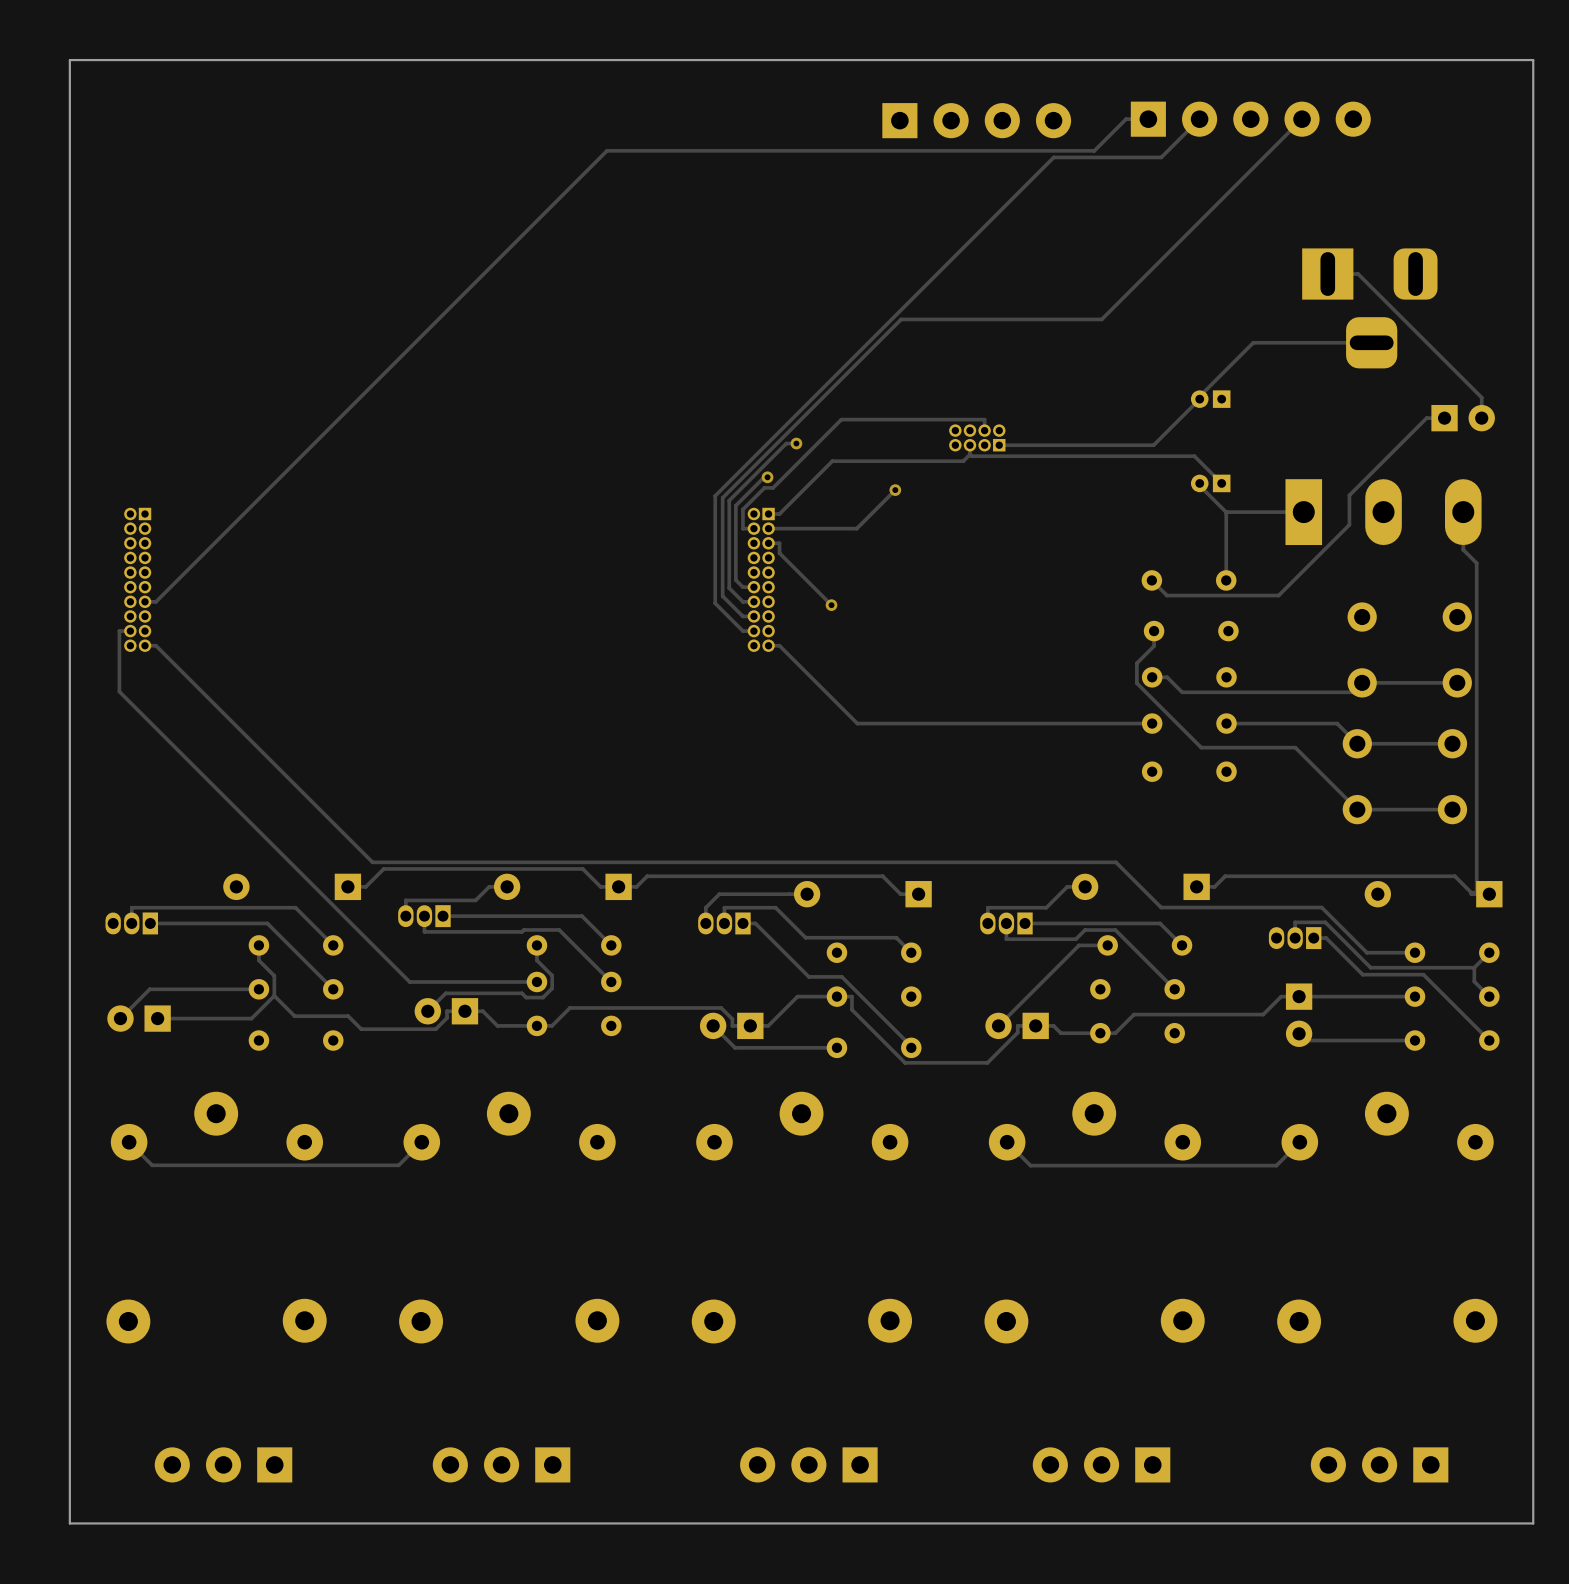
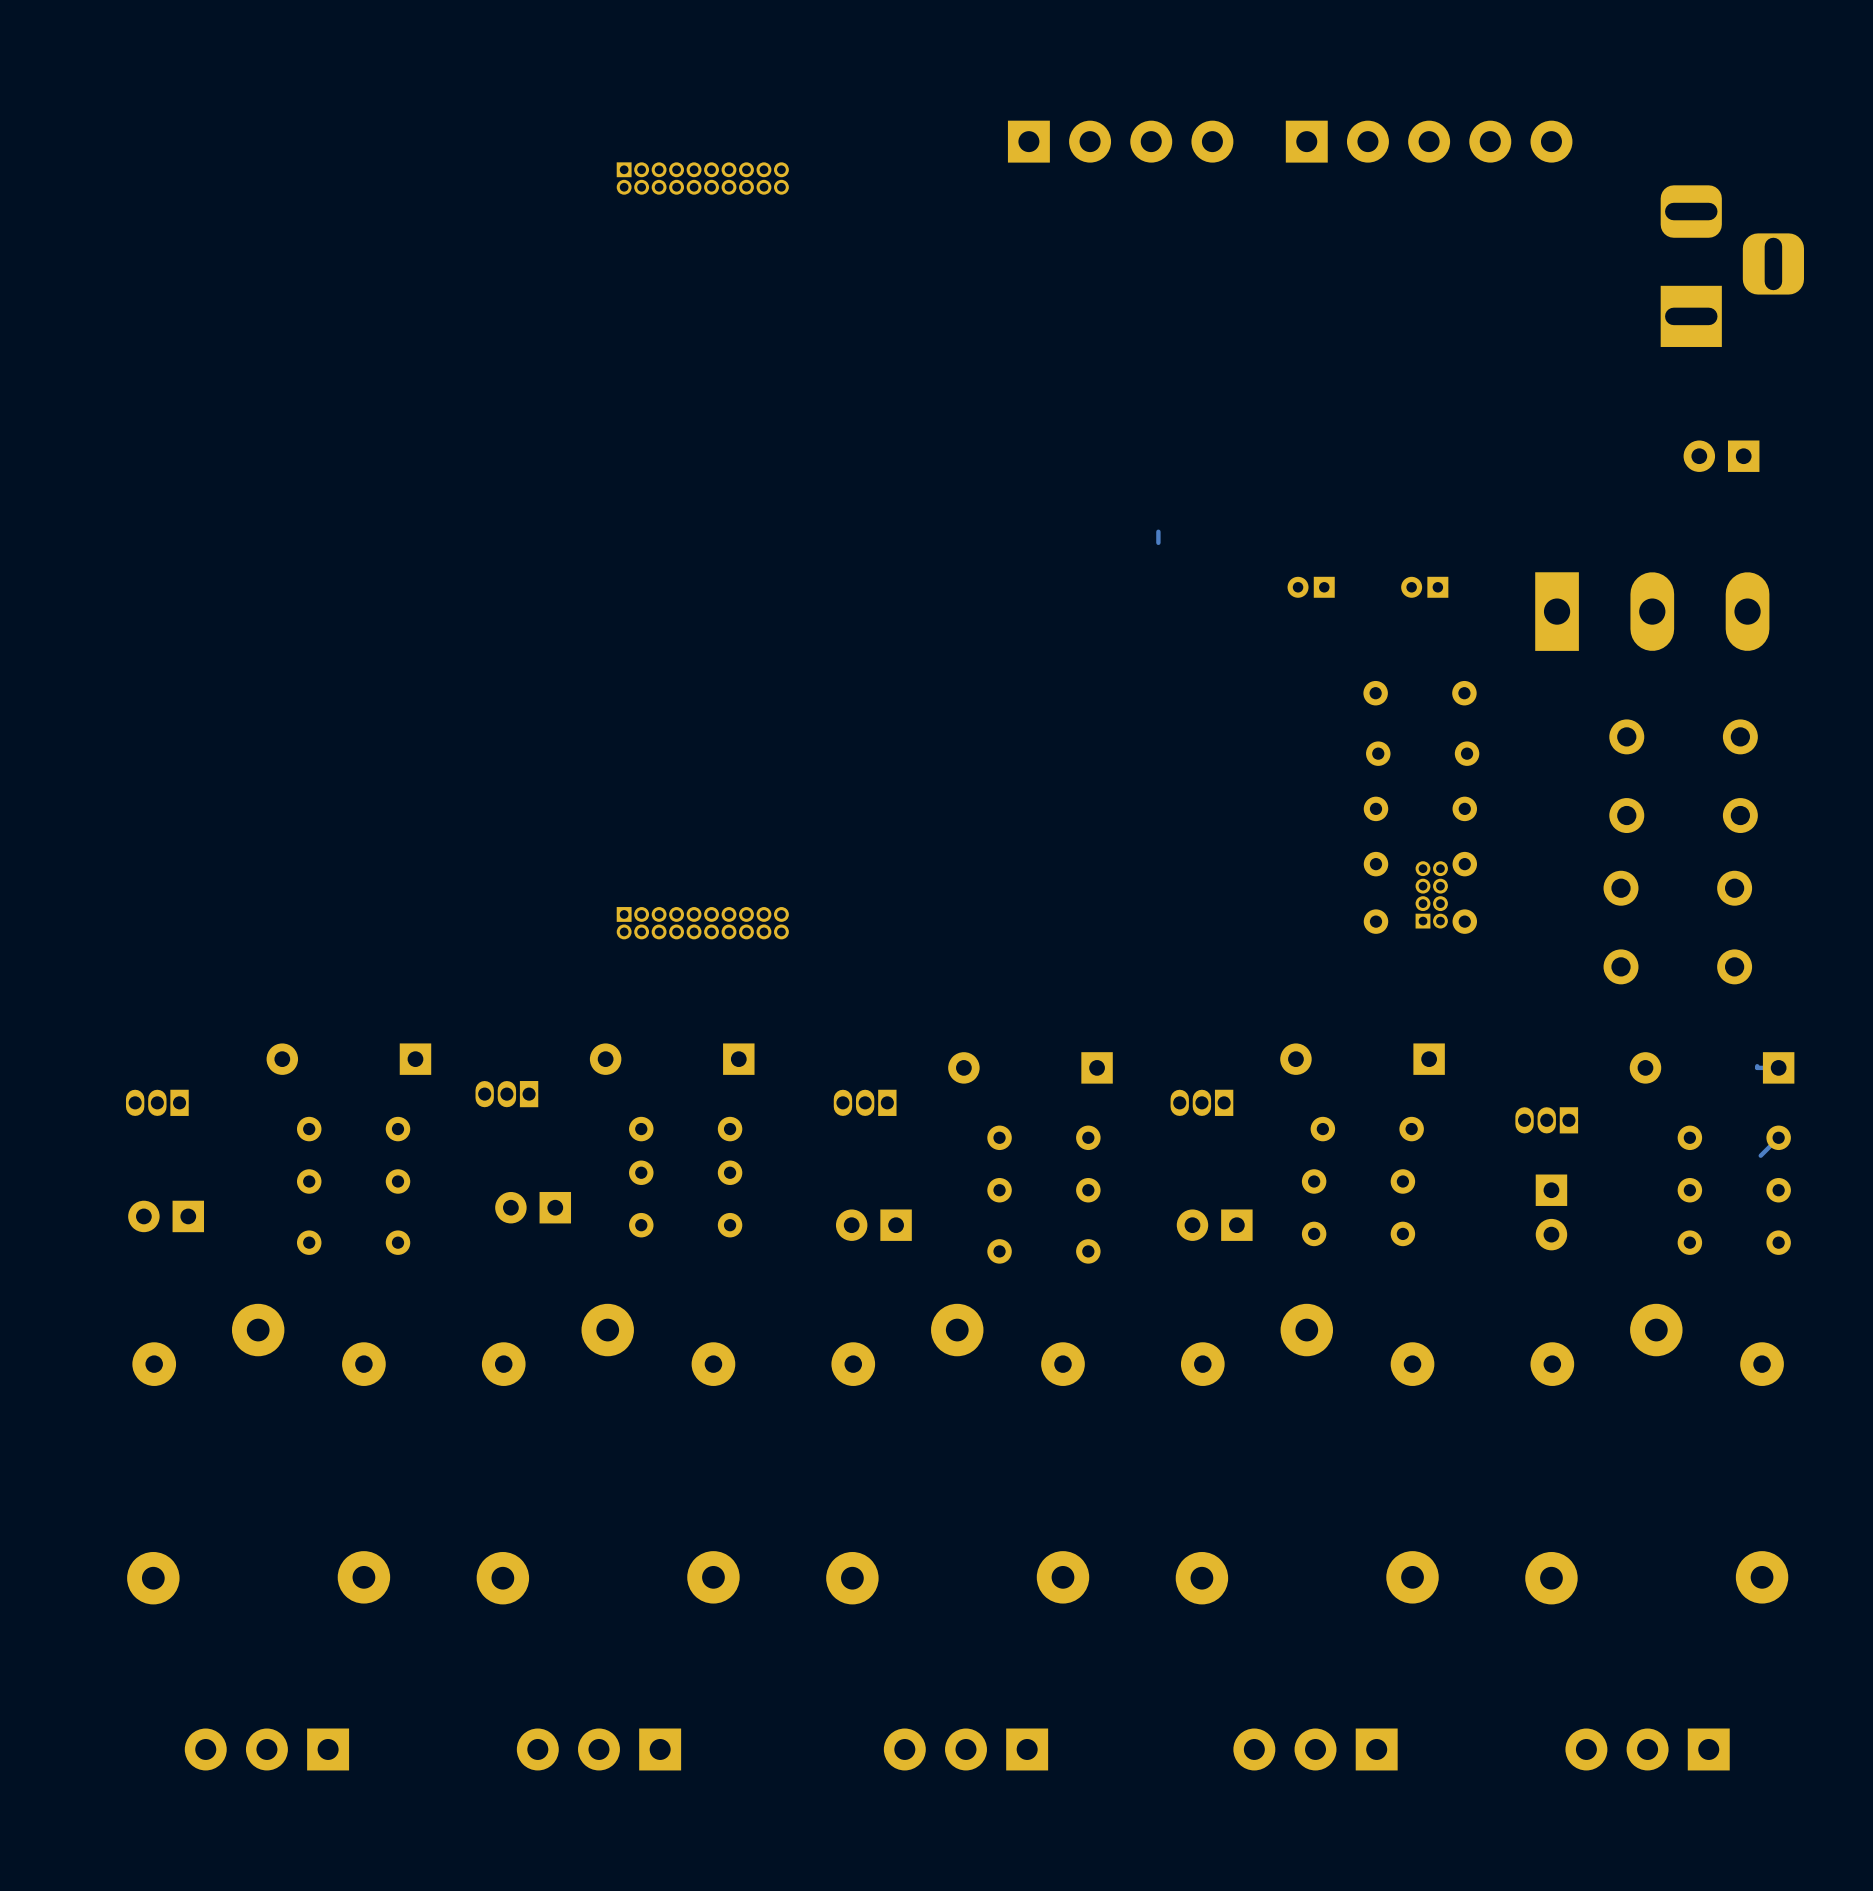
board edge: (1533, 60) (1533, 1523) (69, 1523) (69, 60) (1533, 60) -> none
track: (1148, 119) (1126, 119) (1094, 150) (606, 150) (155, 601) (145, 601) -> none
track: (1199, 119) (1161, 157) (1053, 157) (715, 495) (715, 603) (742, 631) (753, 631) -> none
part position: (1250, 119) -> (1429, 141)
track: (1302, 119) (1101, 319) (901, 319) (722, 497) (722, 596) (742, 616) (753, 616) -> none
part position: (976, 120) -> (1120, 141)
part: none -> (702, 178)
track: (1327, 274) (1358, 274) (1481, 397) (1481, 418) -> none
part rotation: 0° (1369, 308) -> 90° counterclockwise (1732, 266)
part position: (1369, 308) -> (1732, 266)
track: (1371, 342) (1253, 342) (1153, 445) (999, 445) -> none
part: (1210, 399) -> none
track: (1444, 418) (1426, 418) (1349, 495) (1349, 524) (1278, 595) (1166, 595) (1151, 580) -> none
part rotation: 0° (1463, 418) -> 180° (1721, 456)
part position: (1463, 418) -> (1721, 456)
track: (984, 430) (984, 419) (841, 419) (773, 487) (764, 487) (742, 509) (742, 528) (753, 528) -> none
part: (977, 437) -> none
track: (796, 443) (786, 443) (729, 500) (729, 588) (742, 601) (753, 601) -> none
via: (796, 443) -> none
track: (767, 477) (764, 477) (735, 505) (735, 580) (742, 587) (753, 587) -> none
via: (767, 477) -> none
track: (1199, 483) (1199, 485) (1226, 512) (1303, 512) -> none
part position: (1210, 483) -> (1424, 587)
track: (1221, 483) (1194, 456) (971, 456) (969, 454) (963, 461) (832, 461) (779, 514) (768, 514) -> none
track: (895, 490) (856, 528) (768, 528) -> none
via: (895, 490) -> none
part: none -> (1311, 587)
track: (1226, 512) (1226, 580) -> none
track: (1463, 512) (1463, 549) (1476, 563) (1476, 891) (1471, 892) (1454, 876) (1225, 876) (1214, 886) (1196, 886) -> none
track: (768, 543) (779, 543) (779, 553) (831, 605) -> none
part: (137, 579) -> none
part: (761, 579) -> none
via: (831, 605) -> none
track: (130, 631) (119, 631) (119, 691) (409, 981) (536, 981) -> none
track: (1154, 631) (1154, 646) (1136, 663) (1136, 683) (1201, 747) (1295, 747) (1357, 809) (1452, 809) -> none
track: (145, 645) (155, 645) (372, 862) (1115, 862) (1161, 907) (1321, 907) (1366, 952) (1414, 952) -> none
track: (768, 645) (779, 645) (857, 723) (1152, 723) -> none
track: (1152, 677) (1167, 677) (1182, 692) (1352, 692) (1362, 682) (1457, 682) -> none
track: (1226, 723) (1337, 723) (1357, 743) (1452, 743) -> none
part: none -> (1431, 894)
part: none -> (702, 923)
track: (347, 886) (365, 886) (383, 868) (582, 868) (600, 886) (636, 886) (647, 876) (882, 876) (900, 894) (918, 894) -> none
track: (507, 886) (489, 886) (475, 900) (405, 900) (405, 916) -> none
track: (1085, 886) (1067, 886) (1046, 907) (987, 907) (987, 923) -> none
track: (807, 894) (719, 894) (705, 907) (705, 923) -> none
track: (424, 916) (424, 931) (559, 929) (611, 981) -> none
track: (443, 916) (582, 916) (611, 945) -> none
track: (131, 923) (131, 907) (295, 907) (333, 945) -> none
track: (150, 923) (267, 923) (333, 989) -> none
track: (724, 923) (724, 907) (775, 907) (805, 937) (896, 937) (911, 952) -> none
track: (743, 923) (755, 923) (808, 976) (841, 976) (911, 1047) -> none
track: (1006, 923) (1006, 939) (1075, 939) (1085, 930) (1115, 930) (1174, 989) -> none
track: (1025, 923) (1160, 923) (1182, 945) -> none
track: (1295, 938) (1295, 922) (1325, 922) (1370, 967) (1474, 967) (1474, 981) (1489, 996) -> none
track: (1313, 938) (1326, 938) (1362, 974) (1423, 974) (1489, 1040) -> none
track: (258, 945) (258, 960) (274, 975) (274, 995) -> none
track: (536, 945) (536, 960) (552, 975) (552, 988) (542, 997) (526, 997) (521, 993) (445, 993) (427, 1011) -> none
track: (1107, 945) (1079, 945) (998, 1025) -> none
track: (258, 989) (149, 989) (120, 1018) -> none
track: (274, 995) (251, 1018) (157, 1018) -> none
track: (274, 995) (294, 1016) (348, 1016) (361, 1029) (435, 1029) (447, 1017) (447, 1011) (482, 1011) (497, 1025) (551, 1025) (569, 1007) (721, 1007) (732, 1019) (732, 1025) (768, 1025) (797, 996) (851, 996) (851, 1009) (905, 1062) (987, 1062) (1017, 1032) (1017, 1025) (1053, 1025) (1060, 1033) (1115, 1033) (1134, 1014) (1263, 1014) (1281, 996) (1414, 996) -> none
track: (713, 1025) (735, 1047) (836, 1047) -> none
track: (1299, 1033) (1305, 1040) (1414, 1040) -> none
track: (421, 1142) (398, 1165) (152, 1165) (129, 1142) -> none
track: (1299, 1142) (1276, 1165) (1030, 1165) (1007, 1142) -> none

